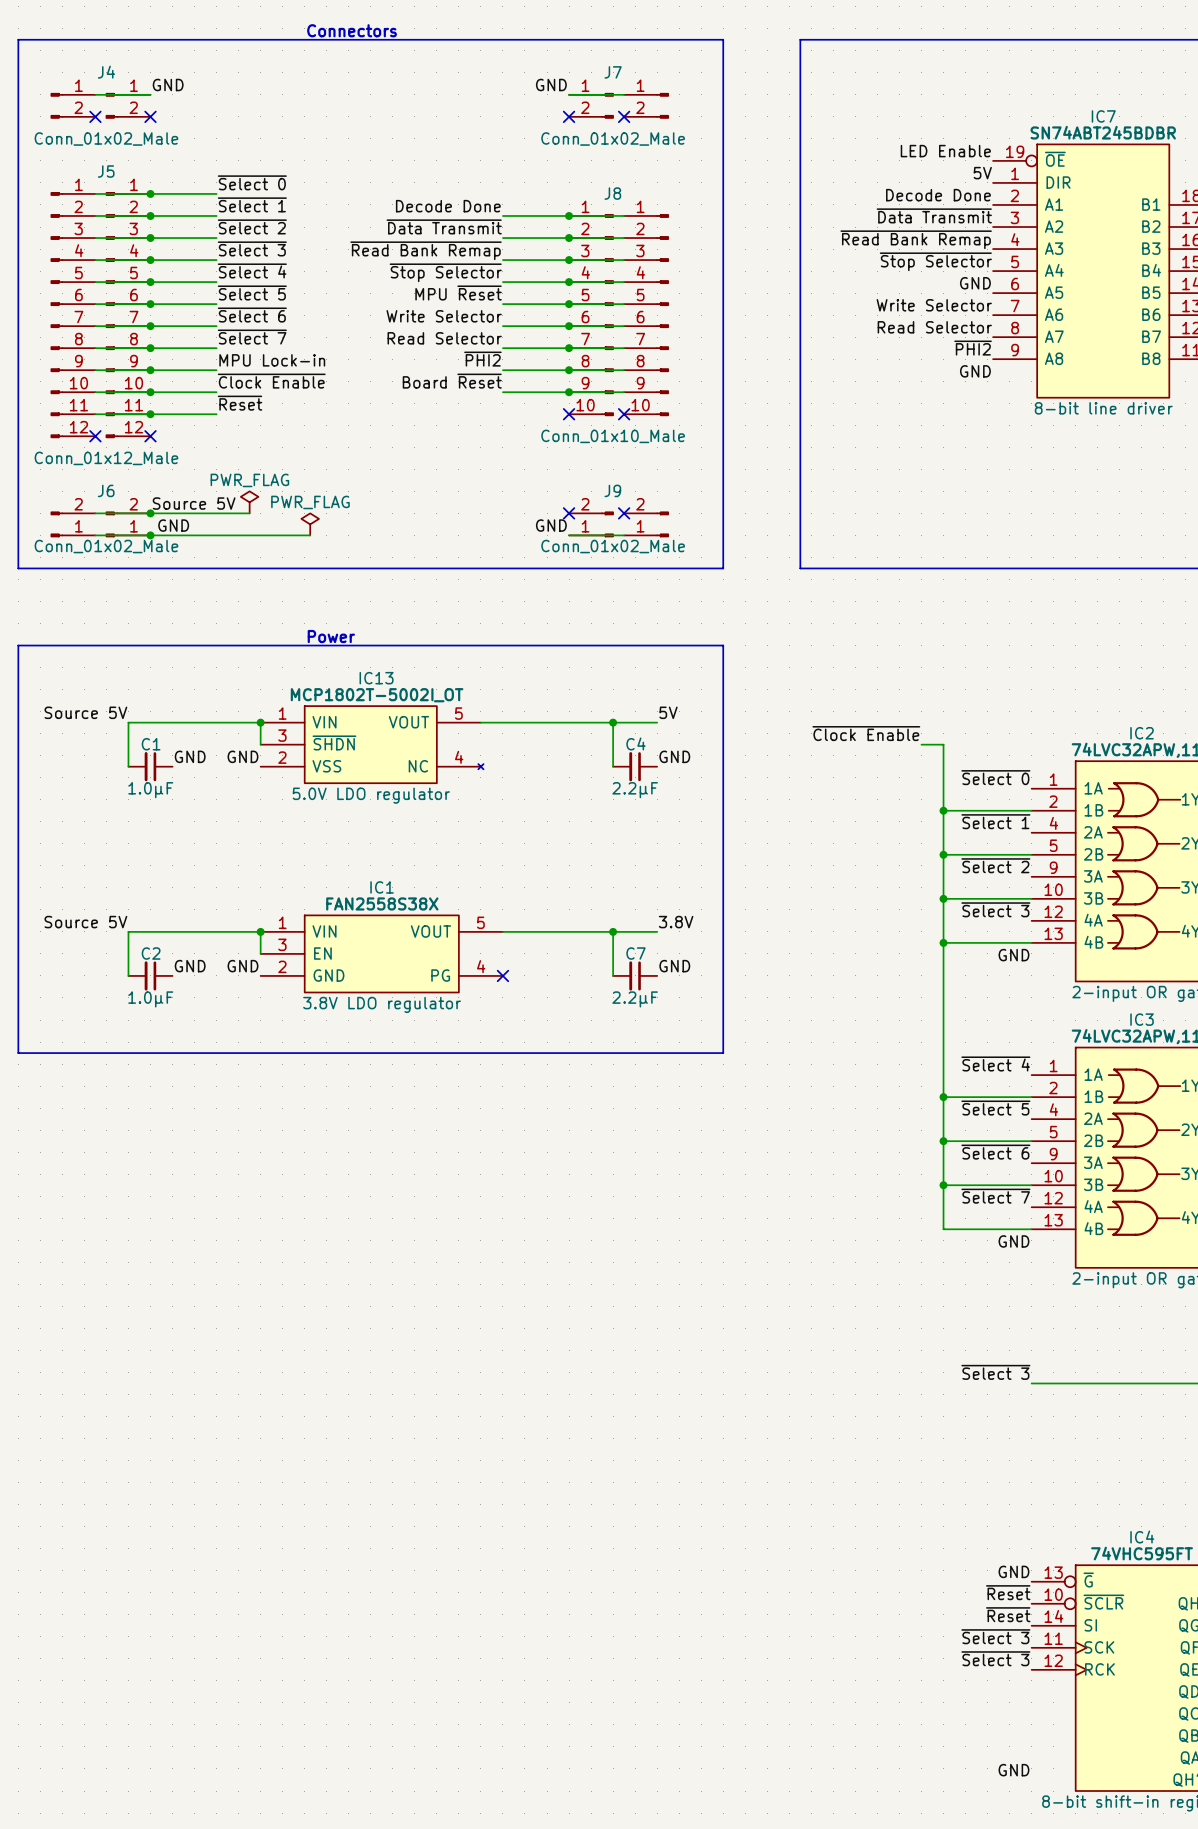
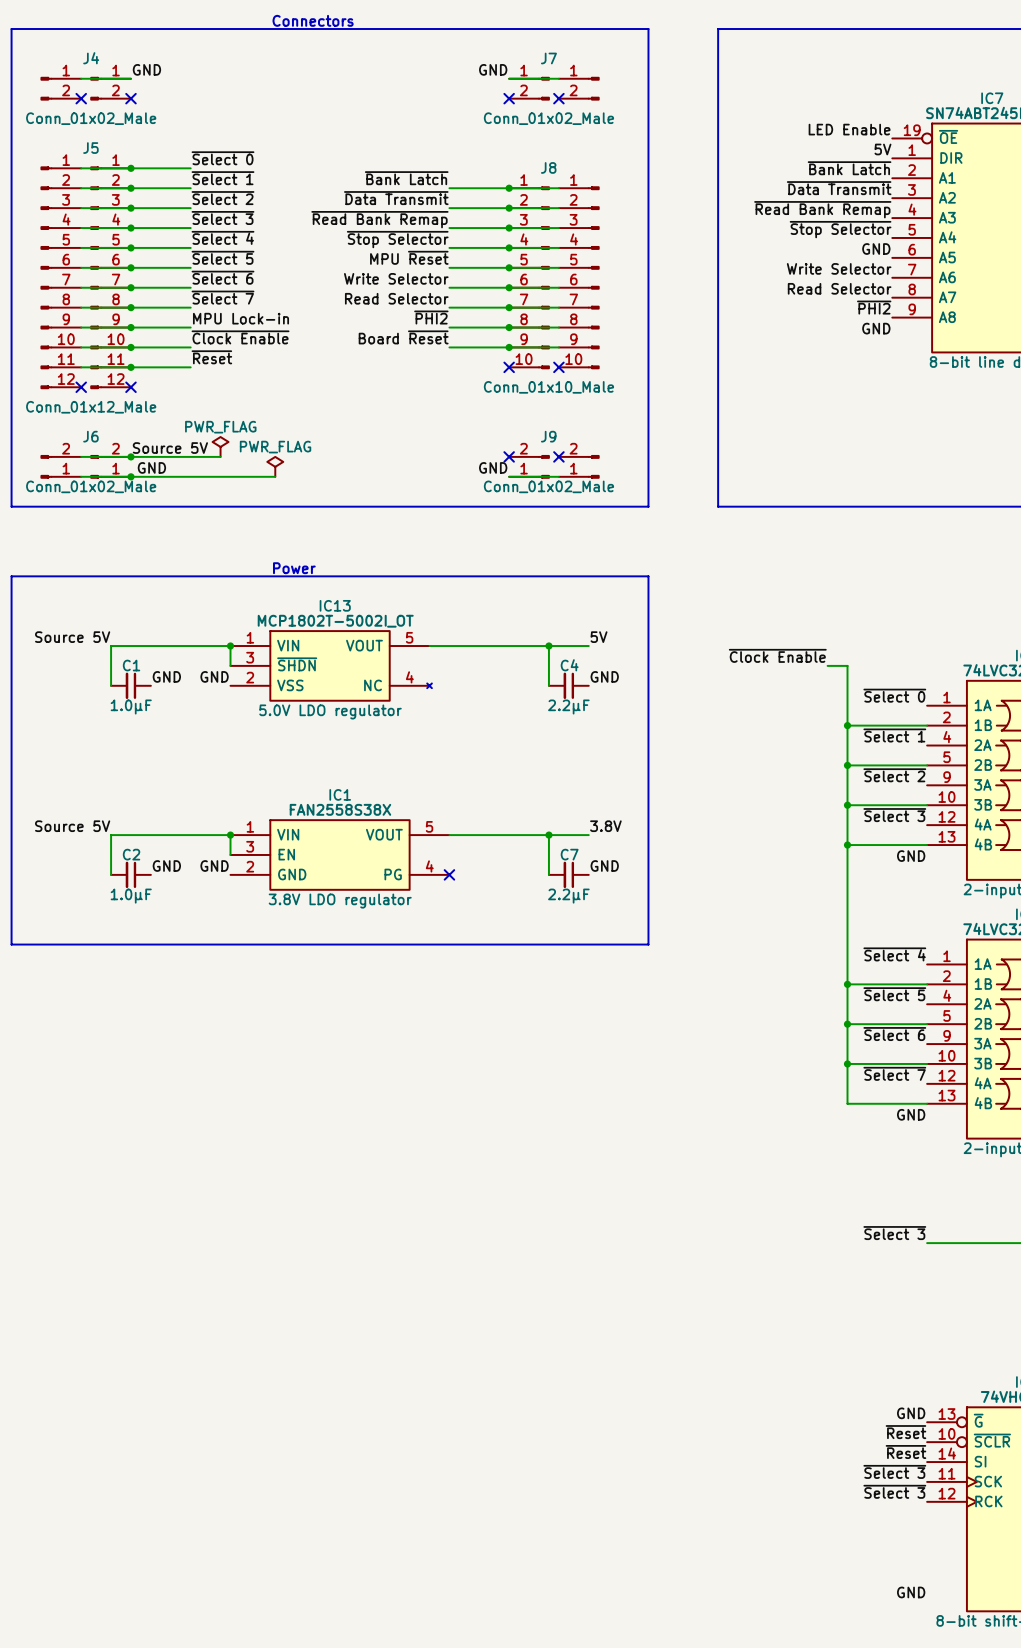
label: Decode Done (938, 195) -> ~{Bank Latch} (849, 168)
label: Decode Done (448, 206) -> ~{Bank Latch} (406, 178)

